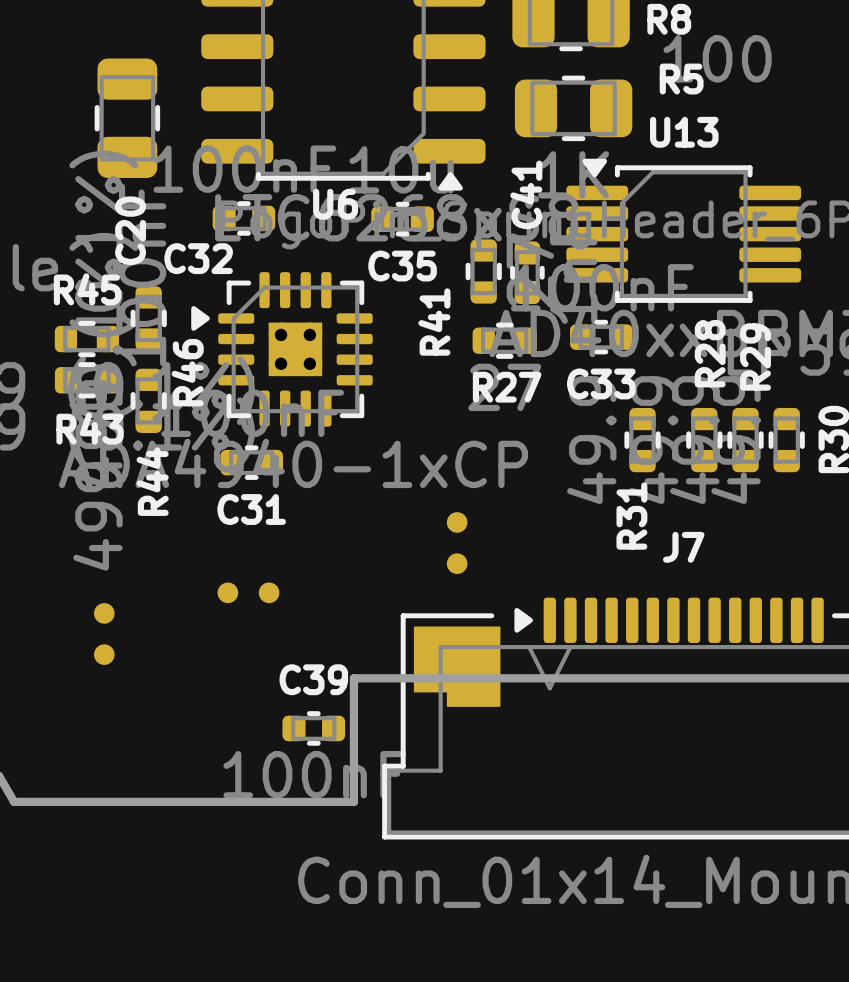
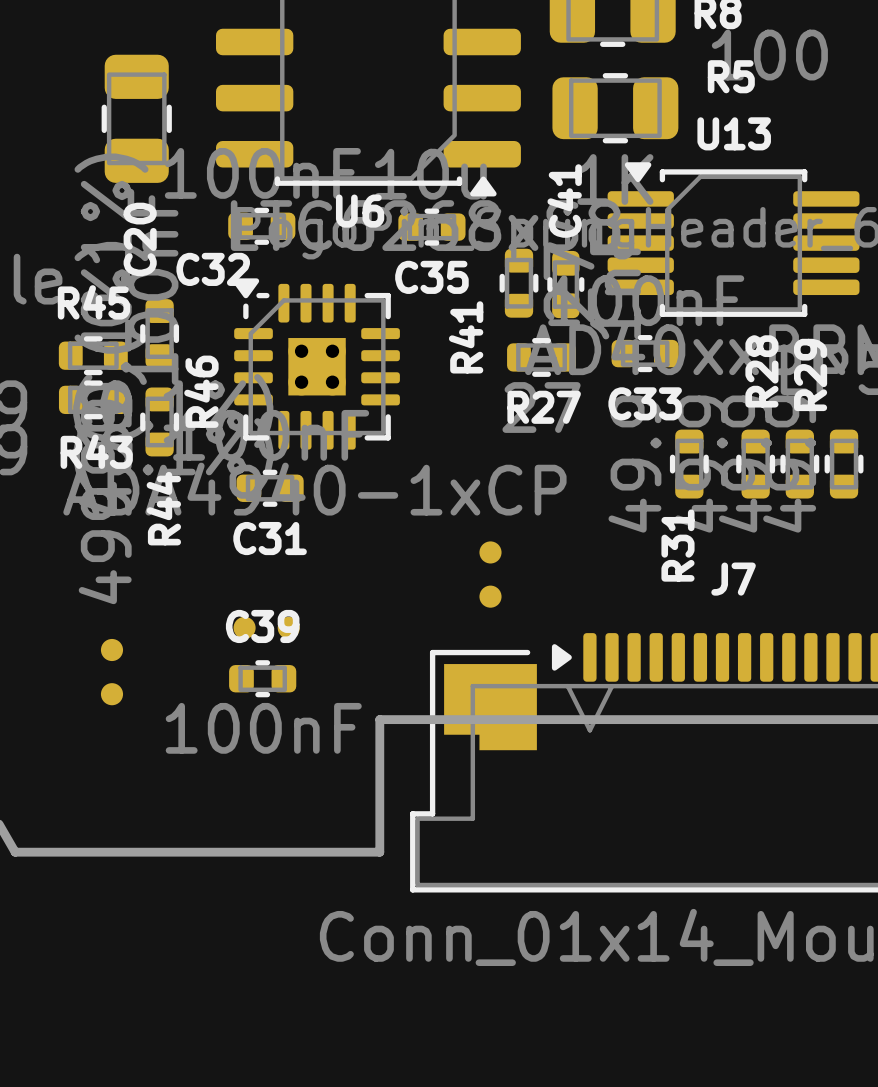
U6 footprint: [191, 272, 373, 427] -> [232, 278, 400, 450]
C39 position: (313, 728) -> (262, 678)

